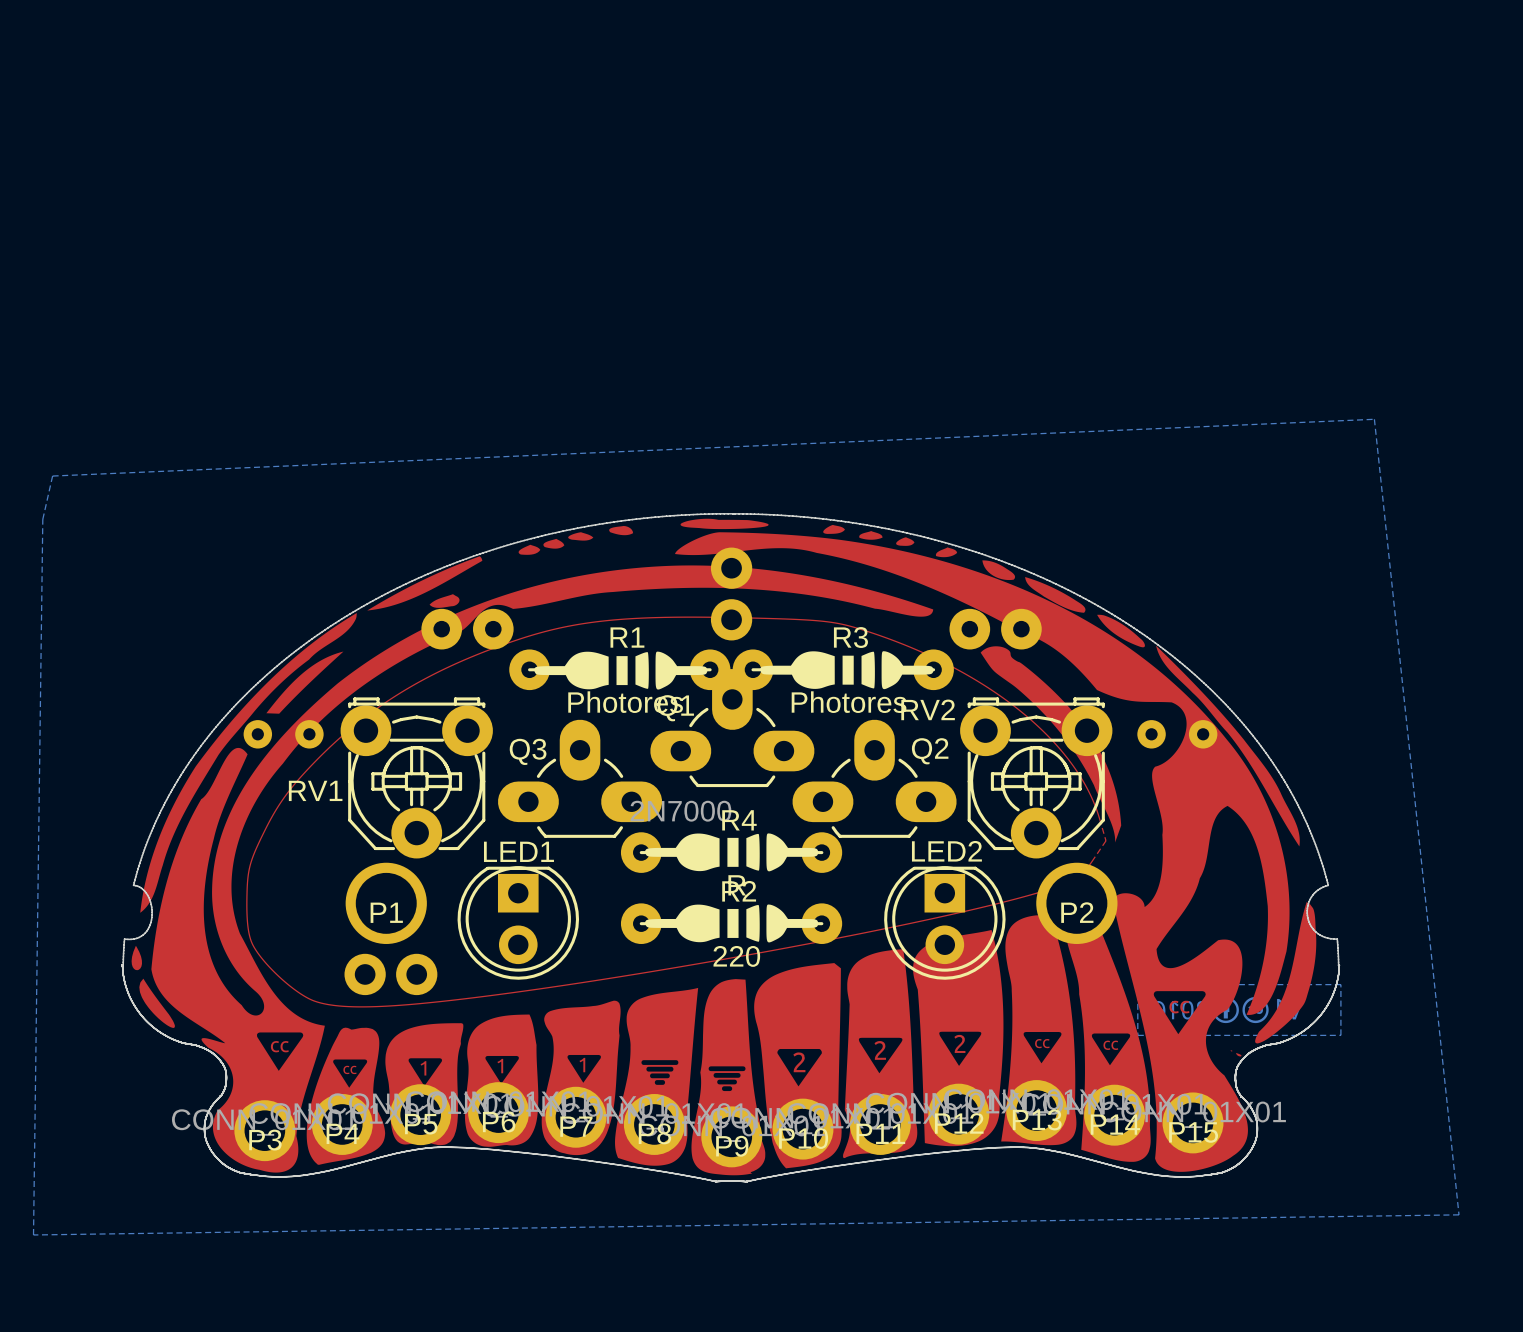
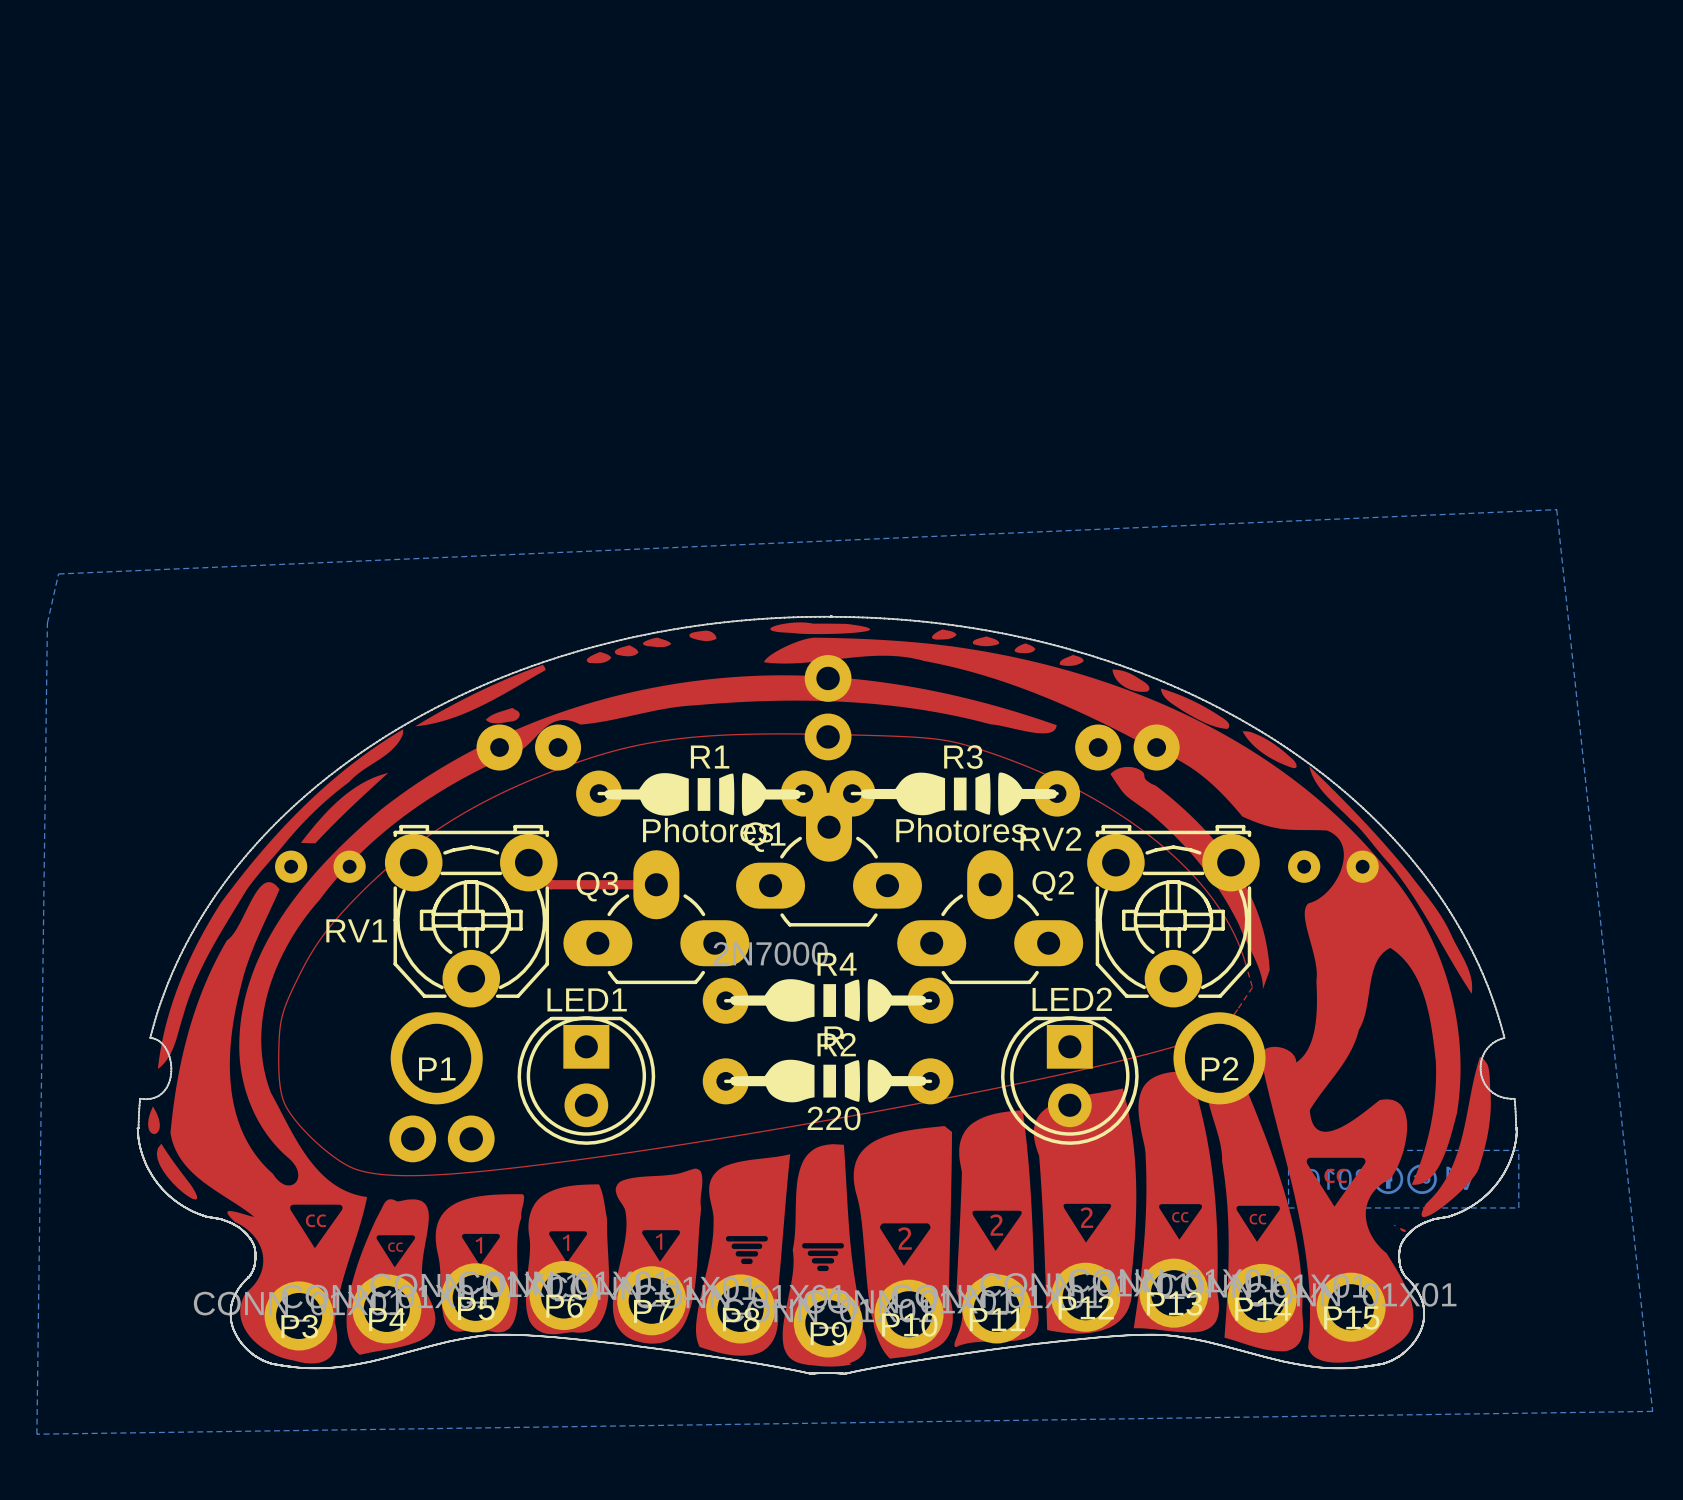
top track: none -> (528, 862) (550, 884) (656, 884)

